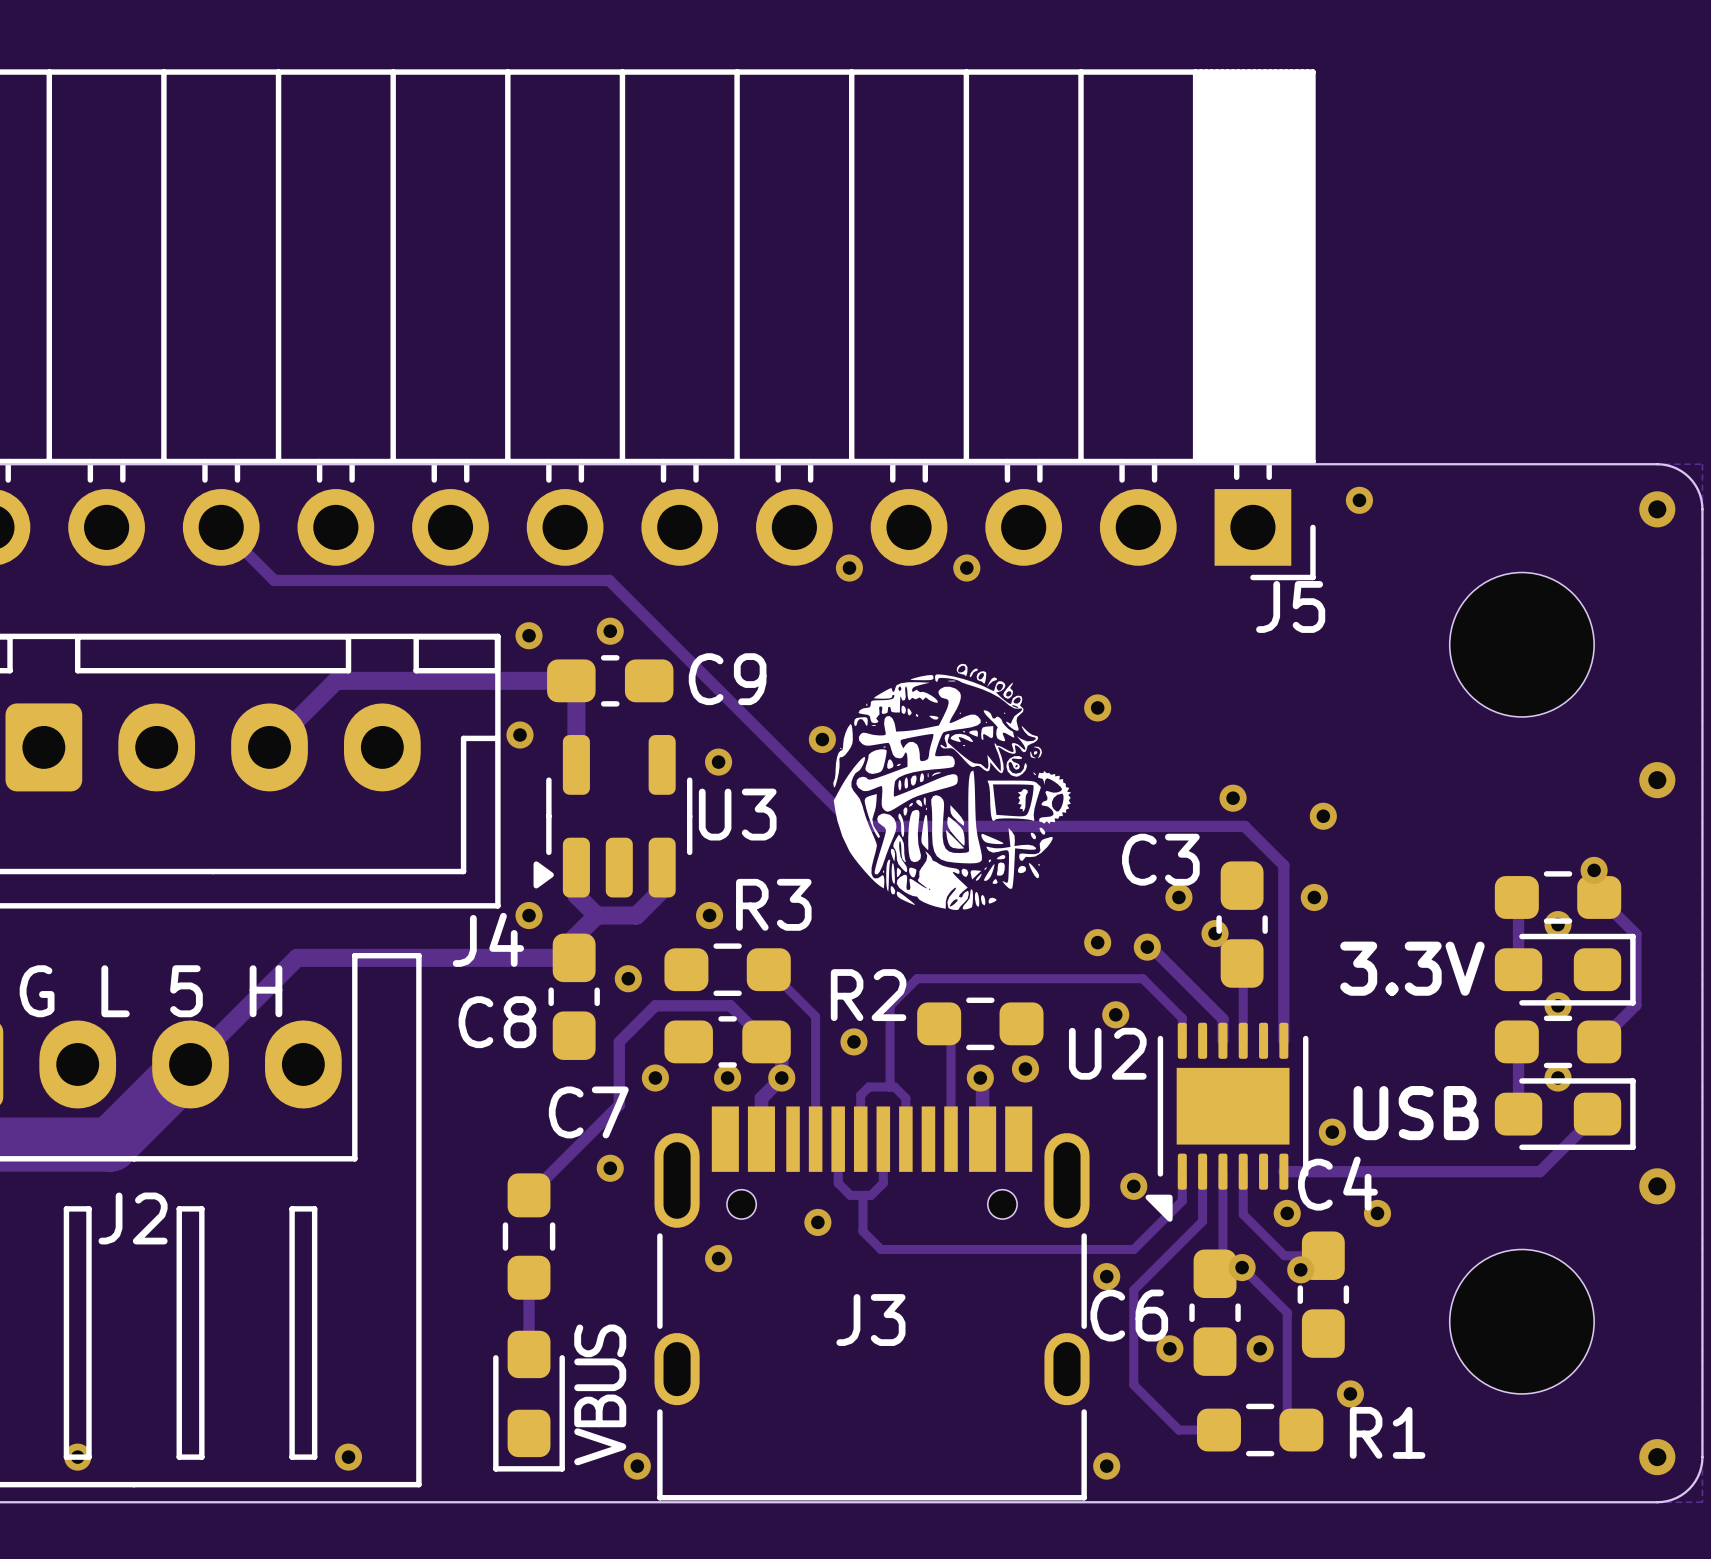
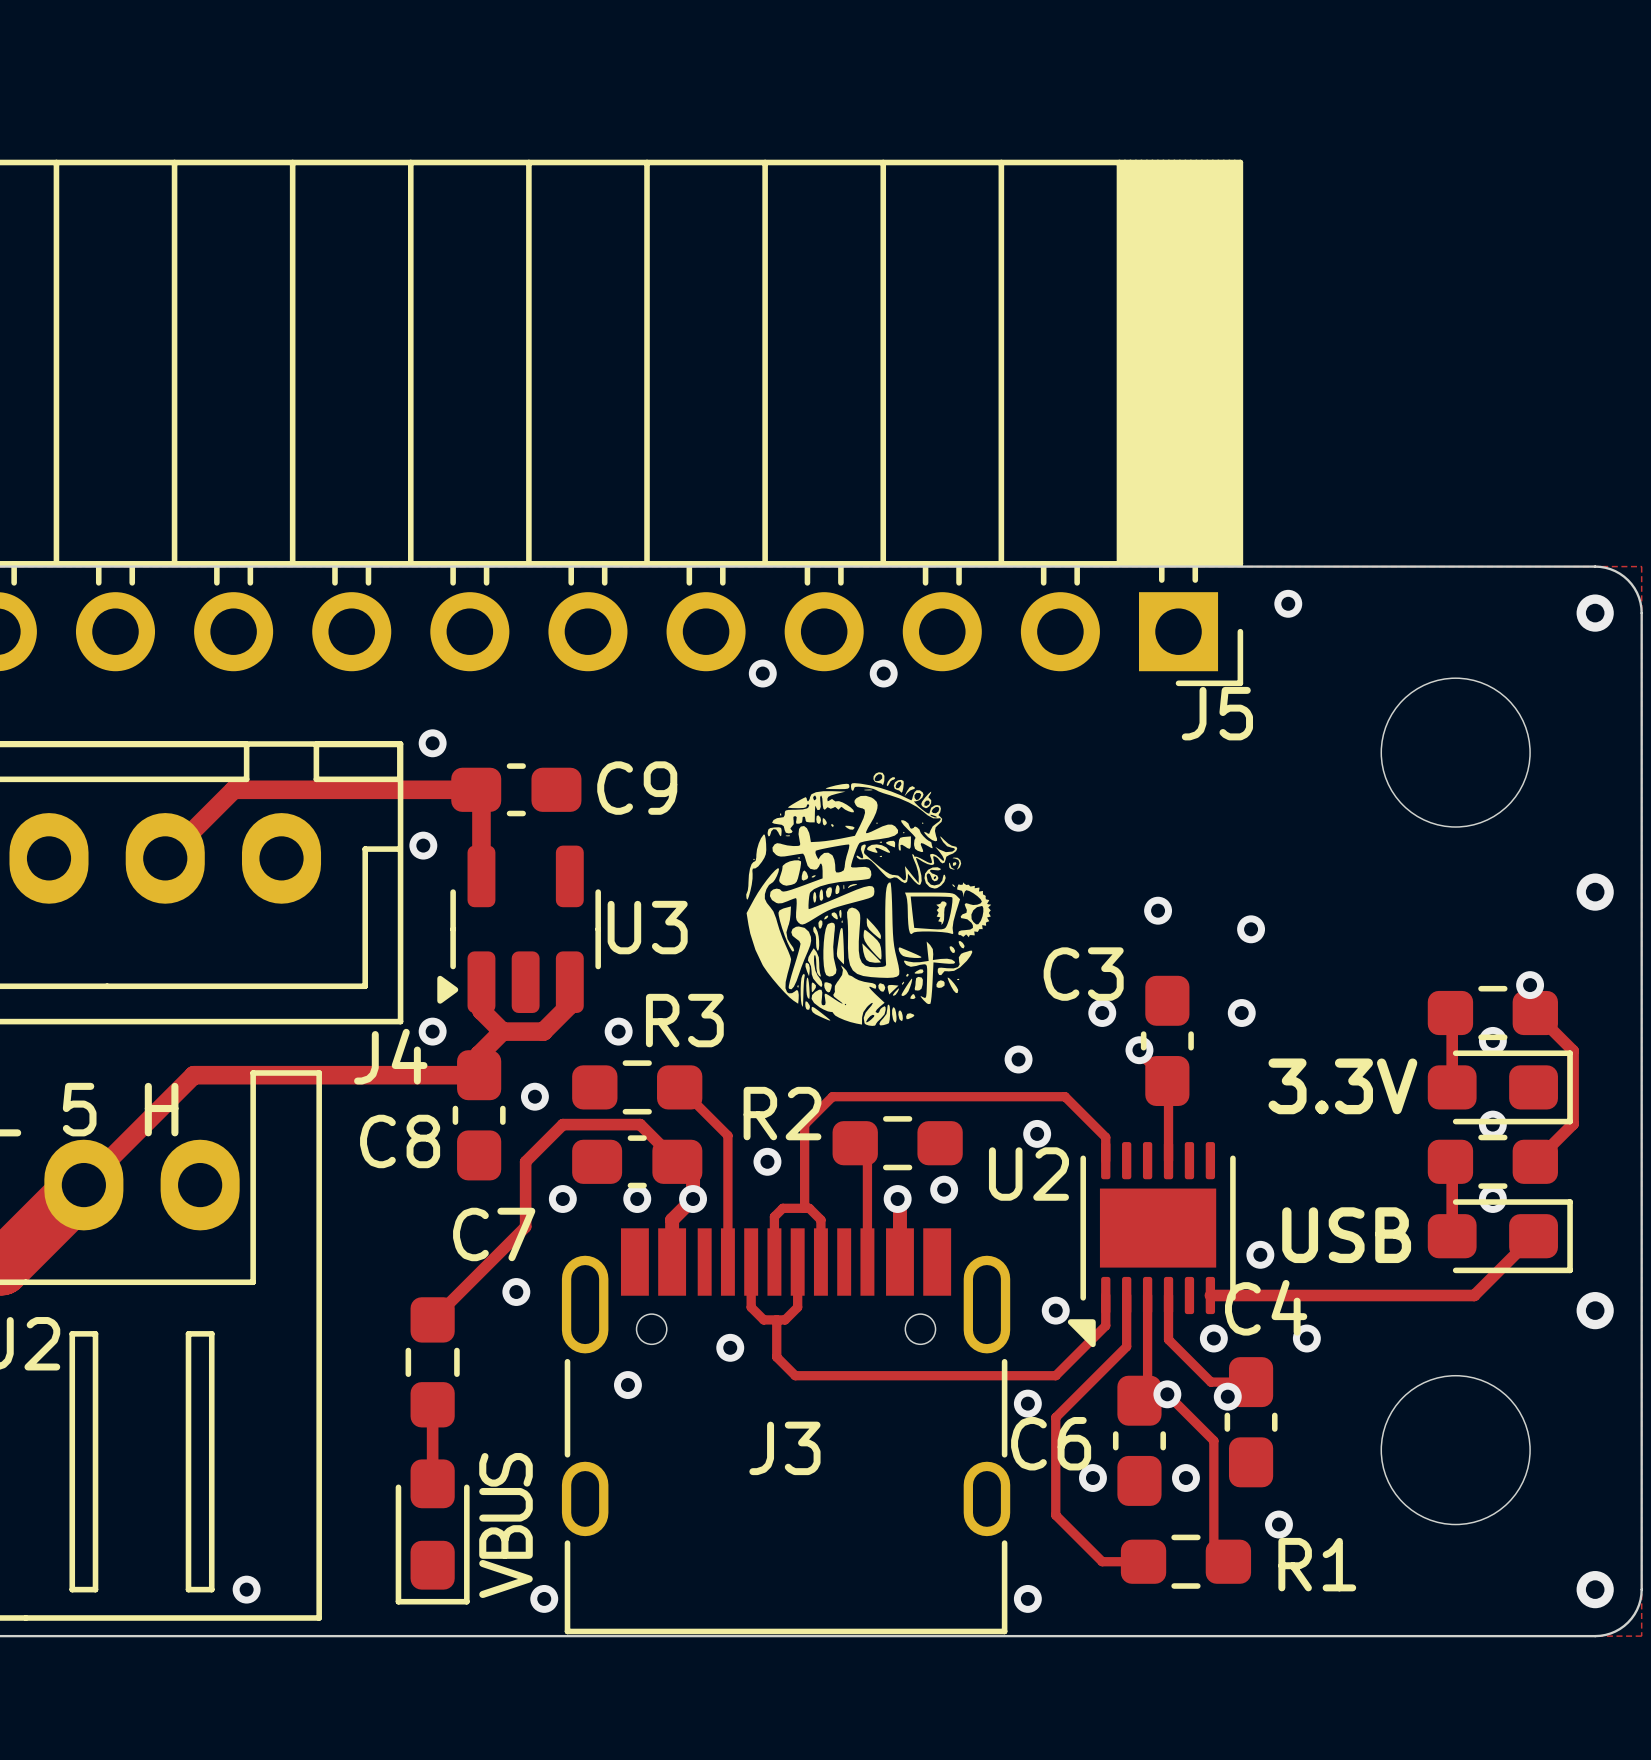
track: (221, 527) (274, 580) (609, 580) (855, 826) (1244, 826) (1283, 865) (1283, 1040) -> none
via: (610, 631) -> none
via: (822, 739) -> none
via: (718, 762) -> none
track: (1147, 947) (1151, 947) (1222, 1019) (1222, 1040) -> none
via: (1147, 947) -> none

